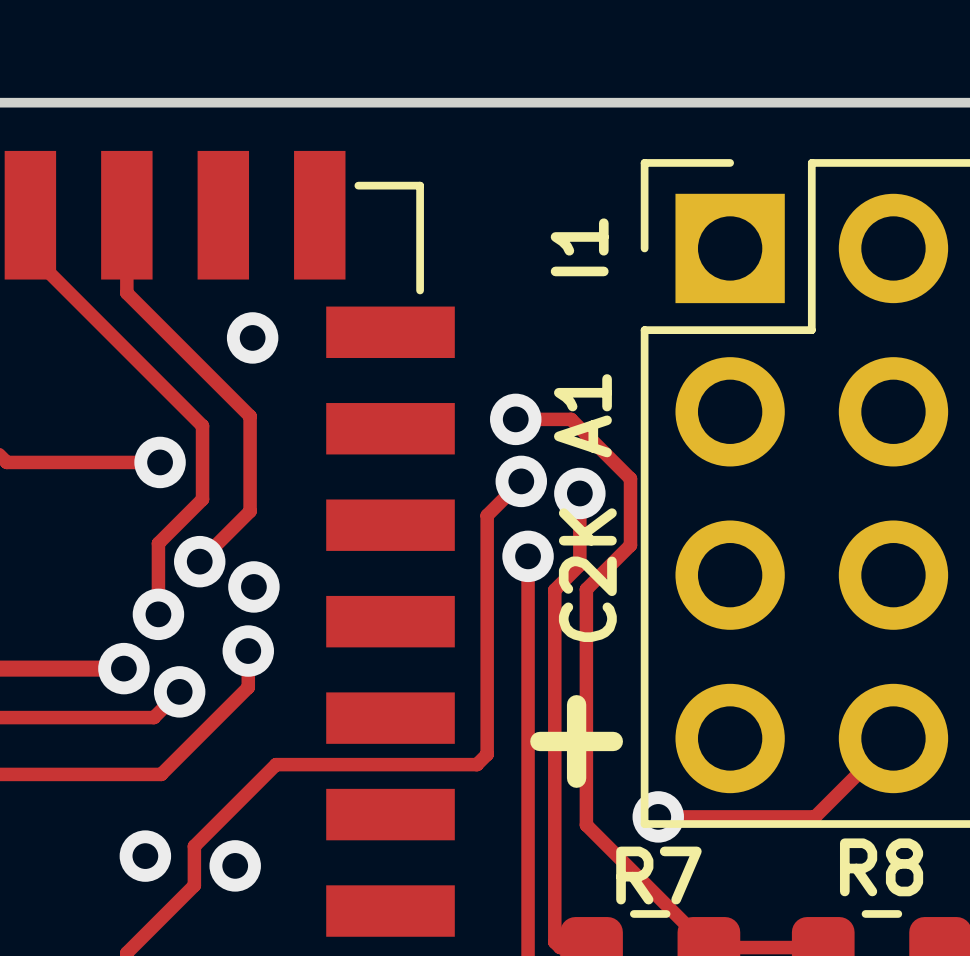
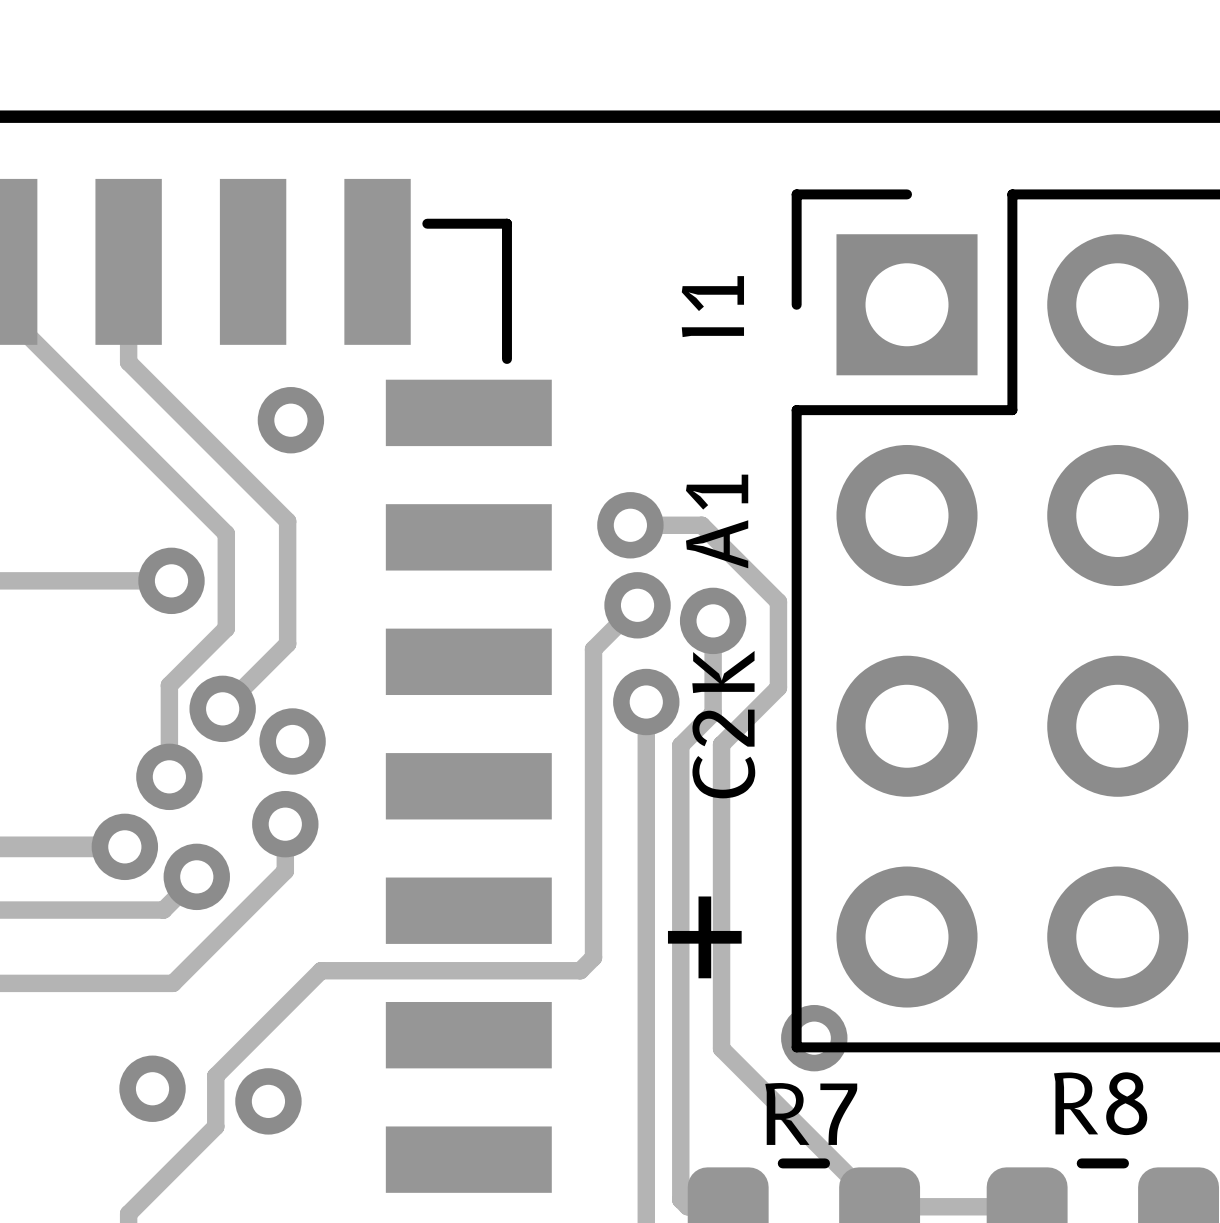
track: (893, 738) (815, 816) (658, 816) -> none

